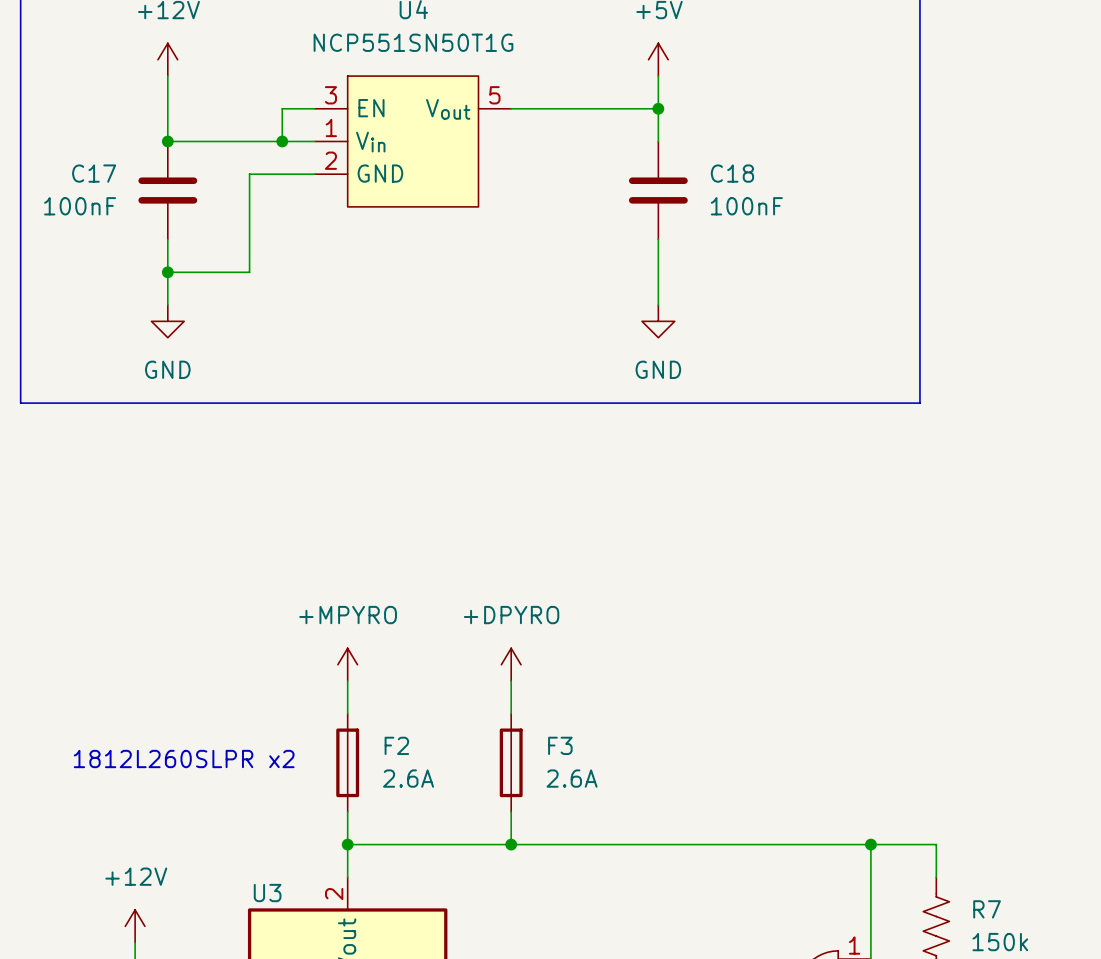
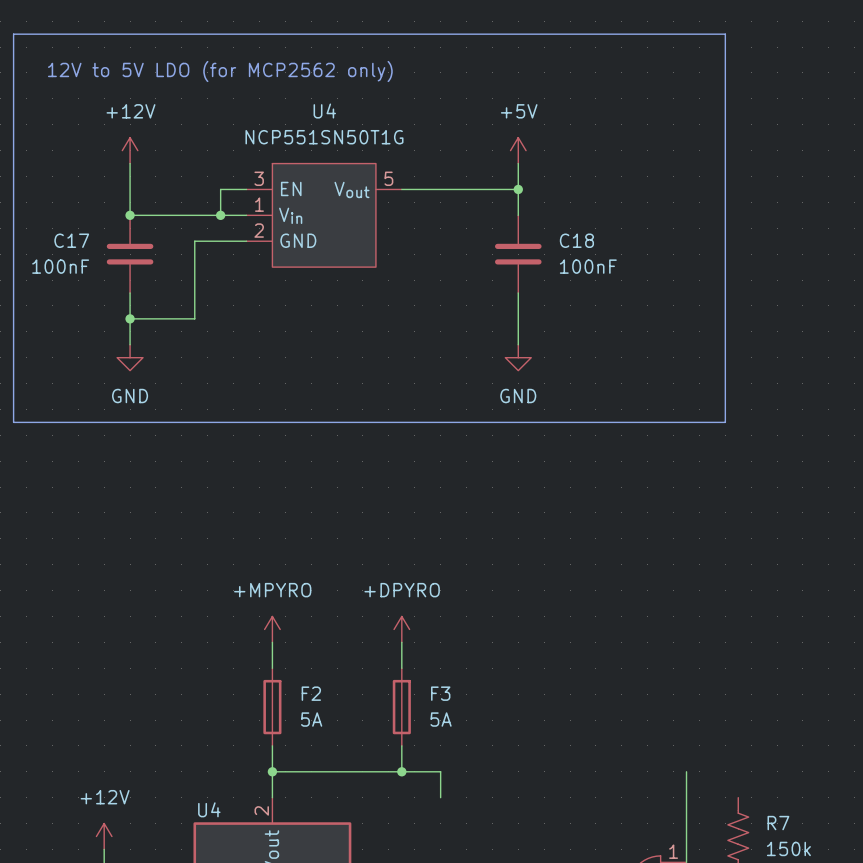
text: 1812L260SLPR x2 (184, 758) -> none
F2 value: 2.6A (408, 778) -> 5A (311, 719)
F3 value: 2.6A (572, 778) -> 5A (441, 719)
wire: (560, 844) (936, 844) (936, 877) -> (440, 771) (440, 797)
junction: (870, 844) -> none
U3 name: U3 (267, 893) -> U4 (209, 809)

